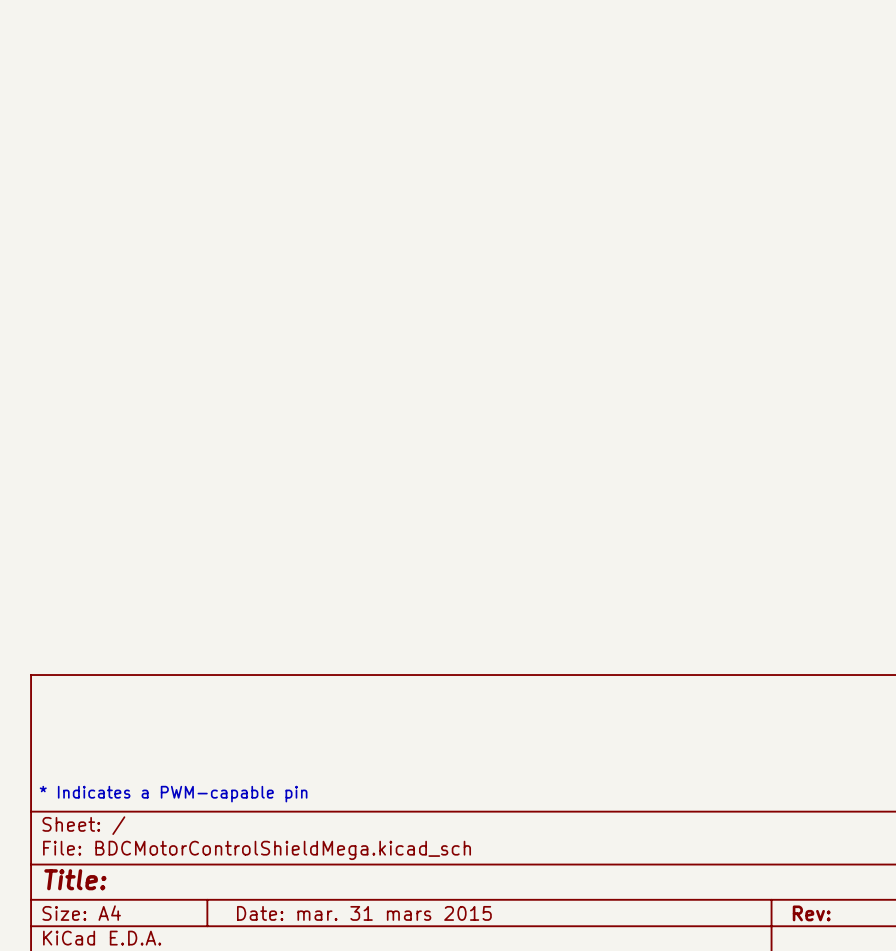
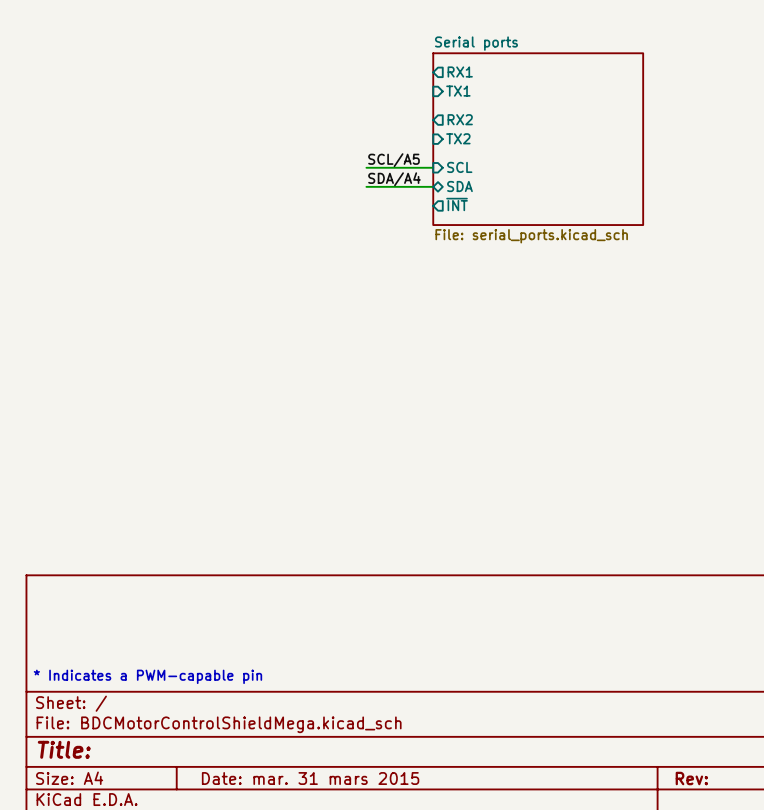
sheet pin: none -> RX1 (460, 72)
sheet pin: none -> TX1 (458, 91)
sheet pin: none -> RX2 (460, 119)
sheet pin: none -> TX2 (458, 138)
sheet Serial ports: none -> File: serial_ports.kicad_sch (538, 139)
label: none -> SCL/A5 (394, 160)
wire: none -> (366, 167) (433, 167)
sheet pin: none -> SCL (459, 167)
label: none -> SDA/A4 (394, 179)
sheet pin: none -> SDA (459, 186)
wire: none -> (366, 186) (433, 186)
sheet pin: none -> ~{INT} (457, 204)

